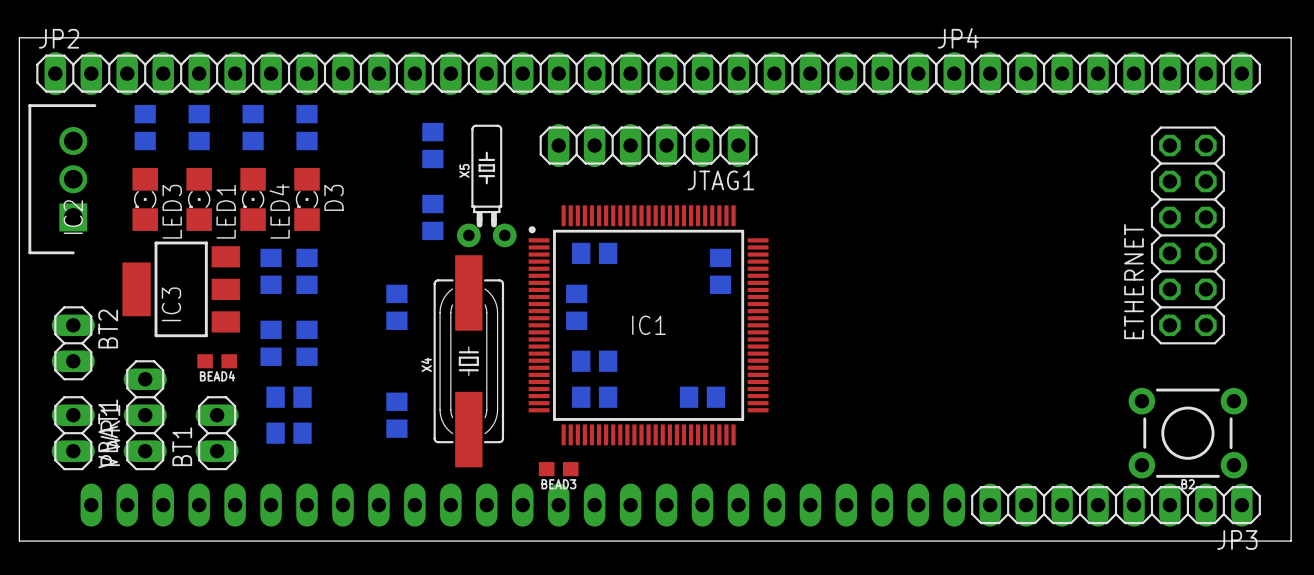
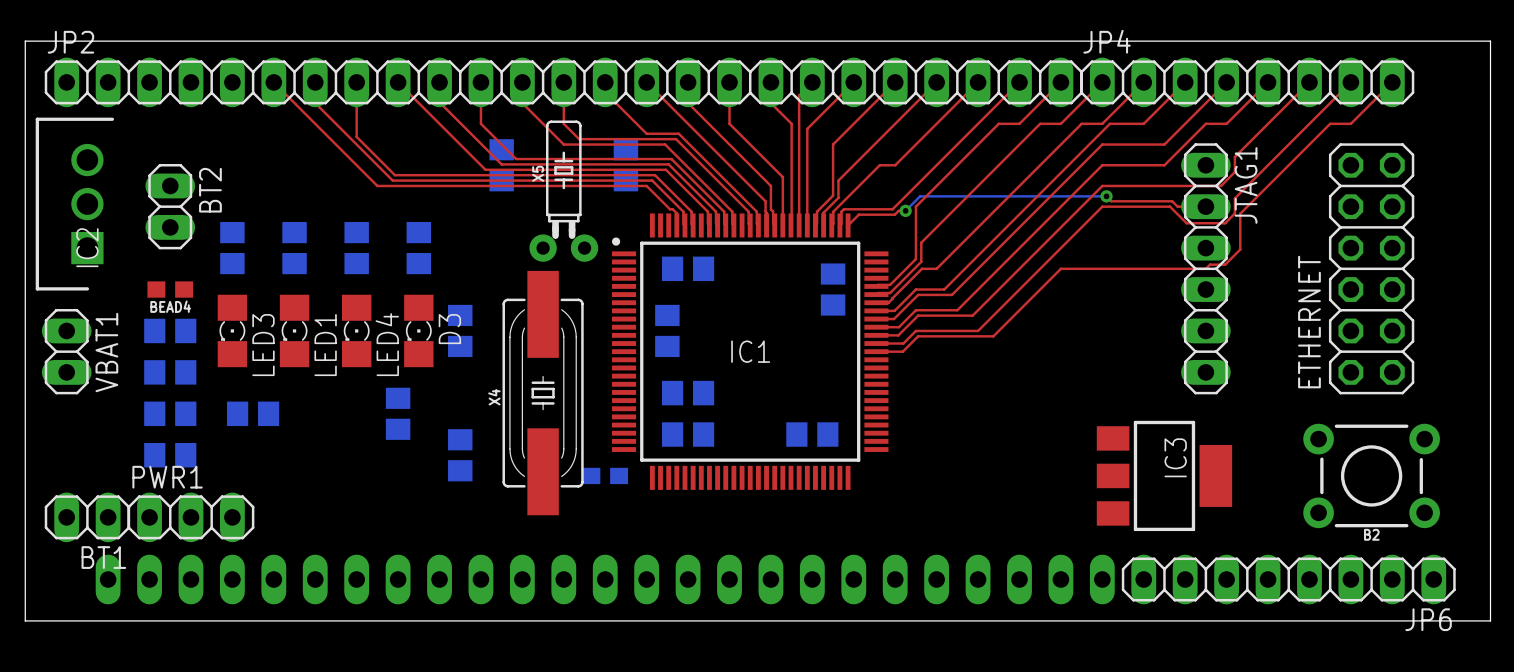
JP4 footprint: [935, 52, 1261, 96] -> [1080, 57, 1415, 108]
top track: none -> (273, 82) (377, 185) (646, 185) (669, 209) (676, 213) (676, 225)
top track: none -> (315, 82) (315, 103) (392, 180) (652, 180) (683, 211) (684, 225)
top track: none -> (356, 82) (356, 136) (394, 175) (655, 175) (691, 211) (693, 225)
top track: none -> (398, 82) (485, 169) (665, 169) (707, 211) (709, 225)
top track: none -> (439, 82) (439, 102) (501, 164) (668, 164) (716, 211) (717, 225)
top track: none -> (480, 82) (480, 123) (516, 159) (671, 159) (724, 211) (725, 225)
top track: none -> (522, 82) (522, 103) (563, 144) (665, 144) (732, 211) (733, 225)
top track: none -> (563, 82) (563, 123) (579, 139) (676, 139) (748, 211) (750, 225)
top track: none -> (605, 82) (605, 92) (646, 133) (678, 133) (756, 211) (758, 225)
top track: none -> (646, 82) (765, 201) (766, 225)
top track: none -> (688, 82) (688, 103) (770, 185) (770, 209) (773, 211) (774, 225)
top track: none -> (729, 82) (729, 123) (782, 177) (782, 225)
top track: none -> (770, 82) (770, 103) (791, 123) (790, 225)
top track: none -> (812, 82) (799, 95) (799, 225)
top track: none -> (853, 82) (807, 128) (807, 225)
top track: none -> (895, 82) (833, 144) (833, 195) (817, 211) (815, 225)
top track: none -> (936, 82) (838, 180) (838, 197) (823, 212) (823, 225)
top track: none -> (978, 82) (895, 165) (879, 165) (833, 211) (831, 225)
top track: none -> (1019, 82) (892, 209) (843, 209) (841, 211) (839, 225)
top track: none -> (1060, 82) (1019, 123) (998, 123) (915, 206) (915, 259) (890, 284) (876, 286)
top track: none -> (1102, 82) (1060, 123) (1040, 123) (921, 242) (921, 261) (890, 293) (876, 294)
top track: none -> (1143, 82) (1102, 123) (1081, 123) (936, 268) (921, 268) (888, 302) (876, 302)
top track: none -> (1185, 82) (1143, 123) (1109, 123) (944, 289) (915, 289) (894, 310) (876, 310)
top track: none -> (1226, 82) (1164, 144) (1102, 144) (951, 294) (918, 294) (894, 319) (876, 319)
top track: none -> (1268, 82) (1226, 123) (1205, 123) (1164, 165) (1102, 165) (957, 310) (915, 310) (898, 327) (876, 327)
top track: none -> (1309, 82) (1234, 156) (1234, 172) (1221, 185) (1102, 185) (972, 315) (918, 315) (898, 335) (876, 335)
top track: none -> (1350, 82) (1234, 198) (1234, 213) (1225, 223) (1186, 223) (1170, 206) (1102, 206) (978, 330) (915, 330) (903, 343) (876, 343)
top track: none -> (1392, 82) (1350, 123) (1330, 123) (1240, 213) (1240, 249) (1225, 264) (1210, 264) (1205, 268) (1060, 268) (993, 336) (918, 336) (902, 351) (876, 351)
part: (145, 127) -> none
part: (199, 127) -> none
part: (253, 127) -> none
part: (307, 127) -> none
part: none -> (625, 165)
JTAG1 rotation: 0° (648, 145) -> 90° clockwise (1205, 268)
JTAG1 position: (648, 145) -> (1205, 268)
top track: none -> (1106, 196) (1111, 201) (1172, 201) (1177, 206) (1205, 206)
bottom track: none -> (1106, 196) (920, 196) (905, 210)
via: none -> (1106, 196)
JTAG1 name position: JTAG1 (720, 180) -> JTAG1 (1246, 185)
X5 position: (486, 185) -> (563, 191)
top track: none -> (905, 210) (898, 210) (894, 214) (858, 214) (848, 225)
via: none -> (905, 210)
LED3 position: (145, 199) -> (232, 330)
LED1 position: (199, 199) -> (294, 330)
LED4 position: (253, 199) -> (356, 330)
D3 position: (307, 199) -> (418, 330)
part: none -> (232, 248)
part: none -> (294, 248)
part: none -> (356, 248)
part: none -> (418, 248)
part: (432, 217) -> none
part position: (594, 253) -> (688, 268)
part: (271, 271) -> none
part: (307, 271) -> none
part position: (720, 271) -> (833, 289)
part: none -> (170, 330)
IC3 rotation: 0° (181, 289) -> 180° (1164, 475)
IC3 position: (181, 289) -> (1164, 475)
part position: (396, 307) -> (460, 330)
part position: (576, 307) -> (667, 330)
part: none -> (170, 372)
IC1 position: (648, 325) -> (750, 351)
BT2 position: (73, 343) -> (170, 206)
part: (271, 343) -> none
part: (307, 343) -> none
part: none -> (688, 393)
part: none -> (170, 413)
BEAD4 position: (217, 361) -> (170, 289)
part: none -> (253, 413)
part: none -> (398, 413)
X4 position: (468, 361) -> (543, 393)
part: (594, 361) -> none
part: none -> (688, 434)
part: none -> (170, 455)
part: (289, 397) -> none
part: (594, 397) -> none
part position: (702, 397) -> (812, 434)
PWR1 rotation: 0° (145, 415) -> 90° clockwise (190, 517)
part position: (396, 415) -> (460, 455)
VBAT1 position: (73, 433) -> (66, 351)
BT1 rotation: 0° (217, 433) -> 90° clockwise (87, 517)
BT1 position: (217, 433) -> (87, 517)
part: (289, 433) -> none
B2 position: (1187, 433) -> (1371, 475)
BT1 name position: BT1 (182, 446) -> BT1 (103, 557)
BEAD3 side: top (558, 469) -> bottom (605, 475)
JP3 name: JP3 (1237, 539) -> JP6 (1428, 619)

